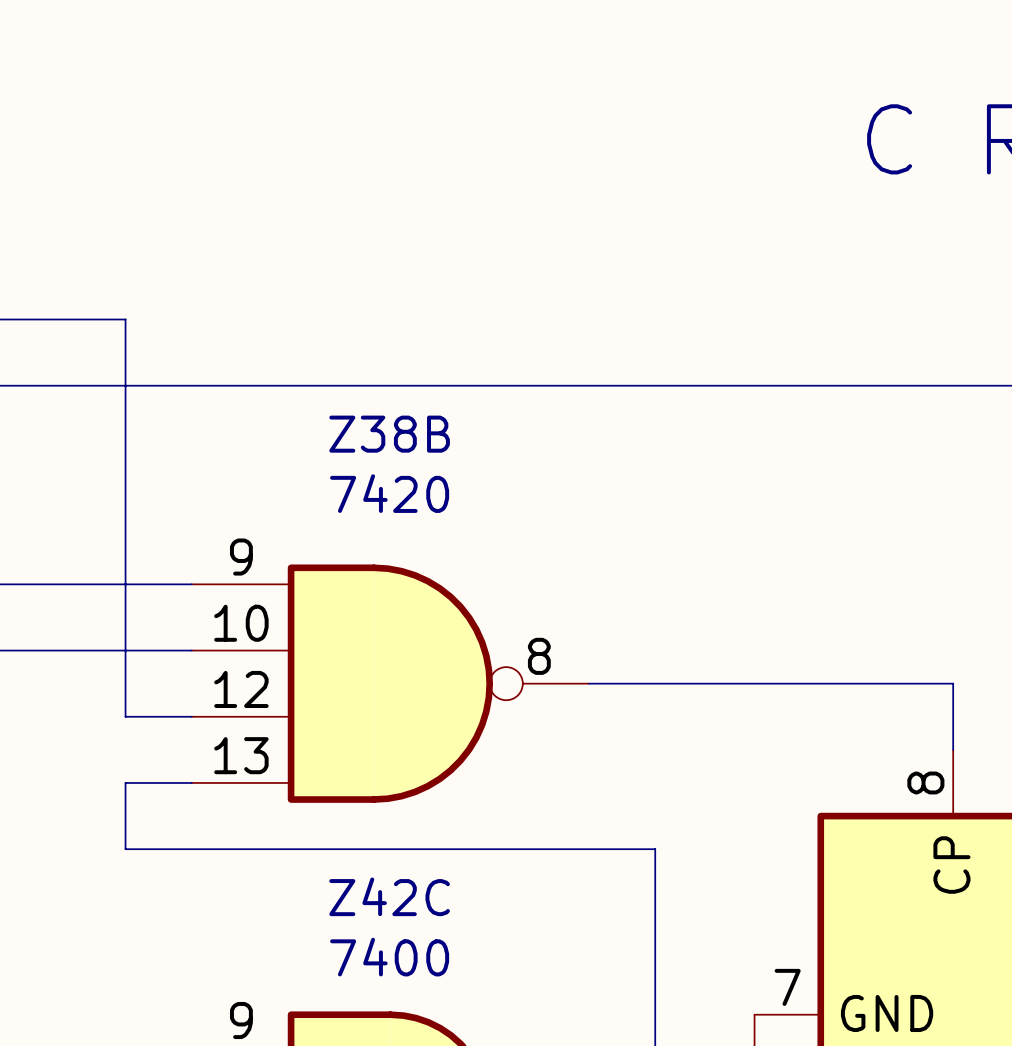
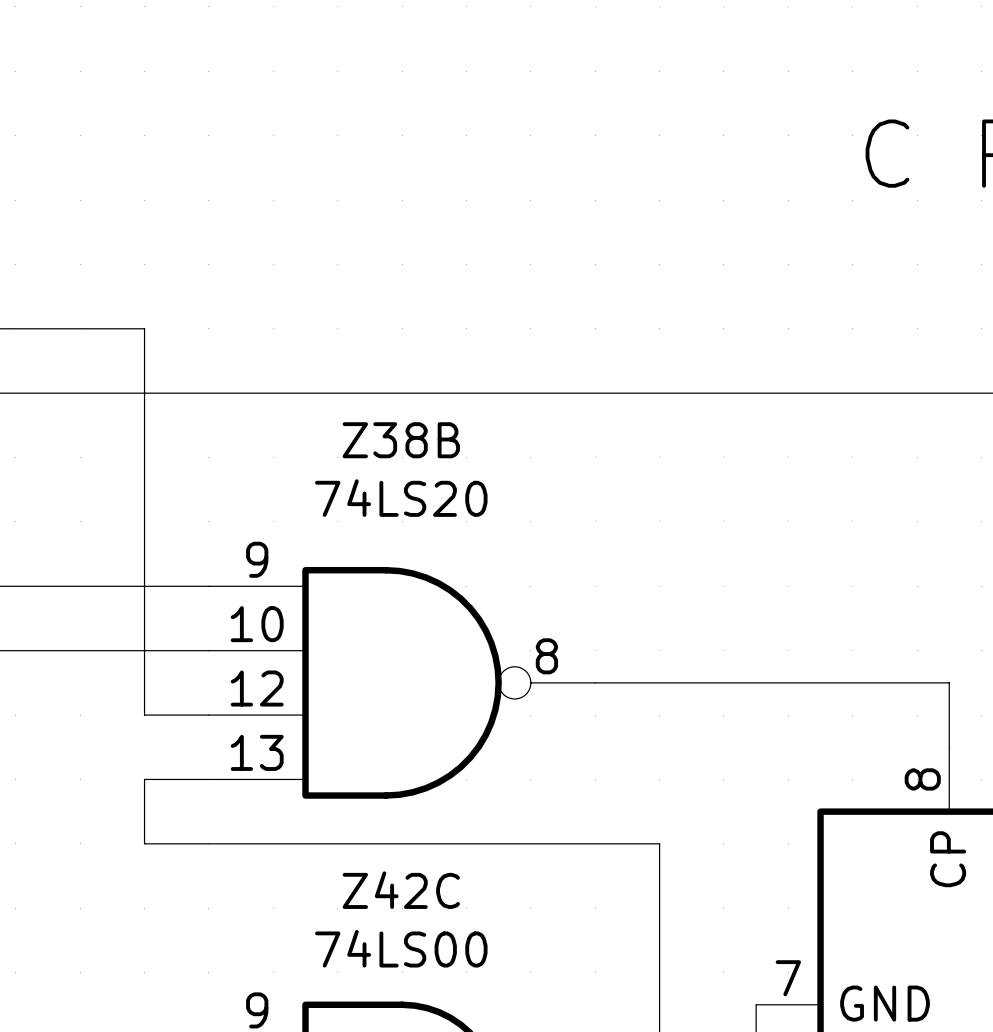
Z38B value: 7420 (389, 493) -> 74LS20 (401, 498)
Z42C value: 7400 (389, 957) -> 74LS00 (401, 948)

